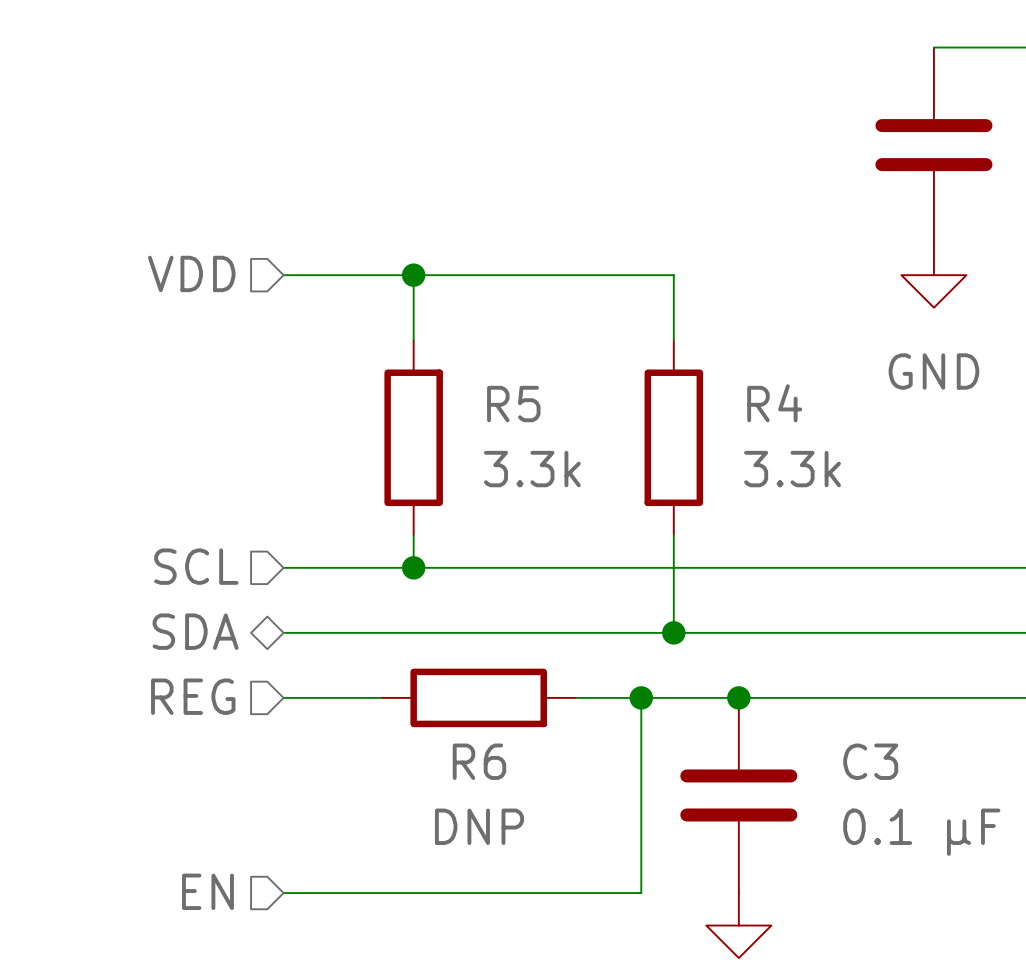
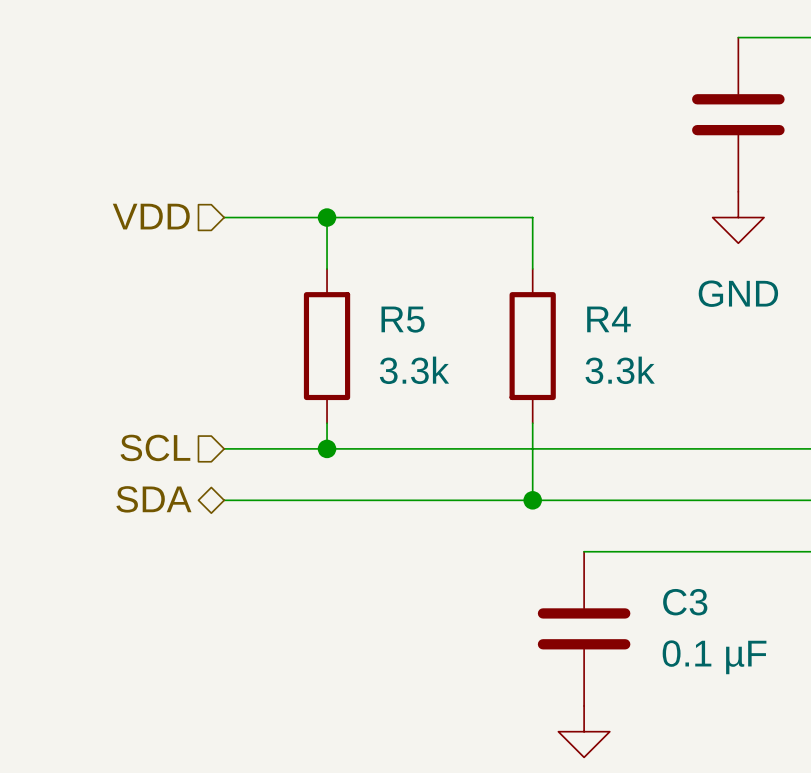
hierarchical label: REG (193, 696) -> none
wire: (283, 697) (381, 697) -> none
R6: DNP (478, 697) -> none
wire: (576, 697) (738, 697) -> none
wire: (641, 697) (641, 893) (283, 893) -> none
junction: (641, 697) -> none
junction: (738, 697) -> none
hierarchical label: EN (207, 891) -> none

